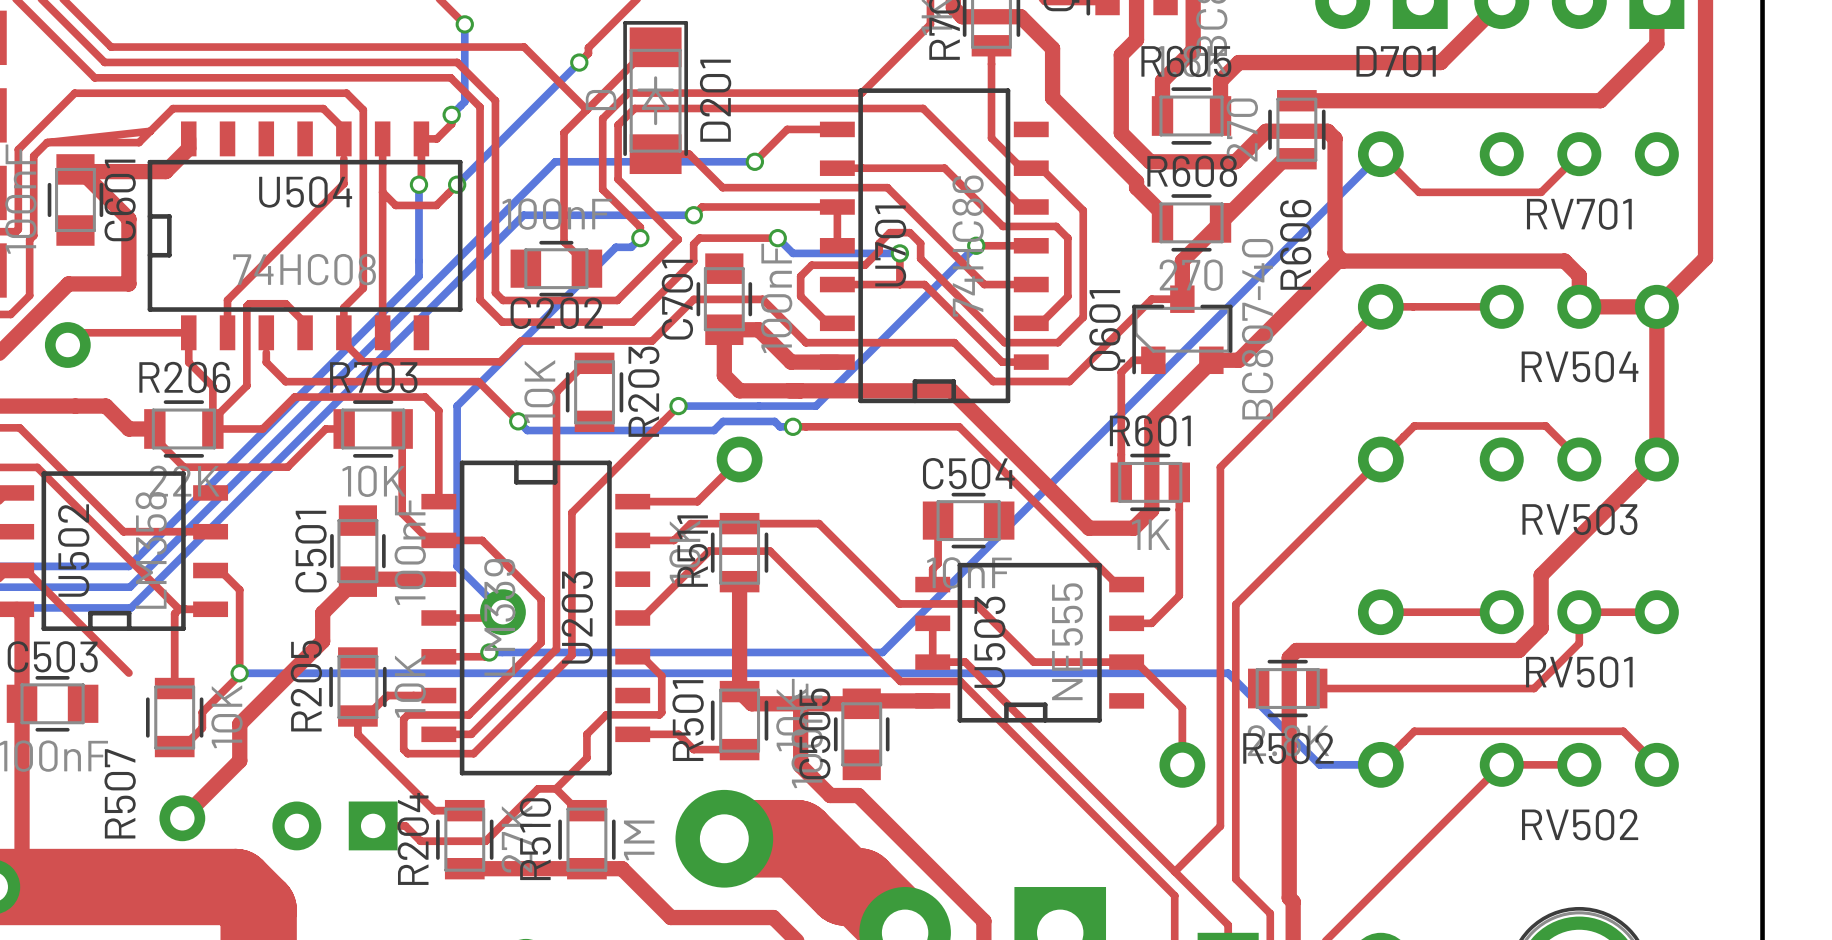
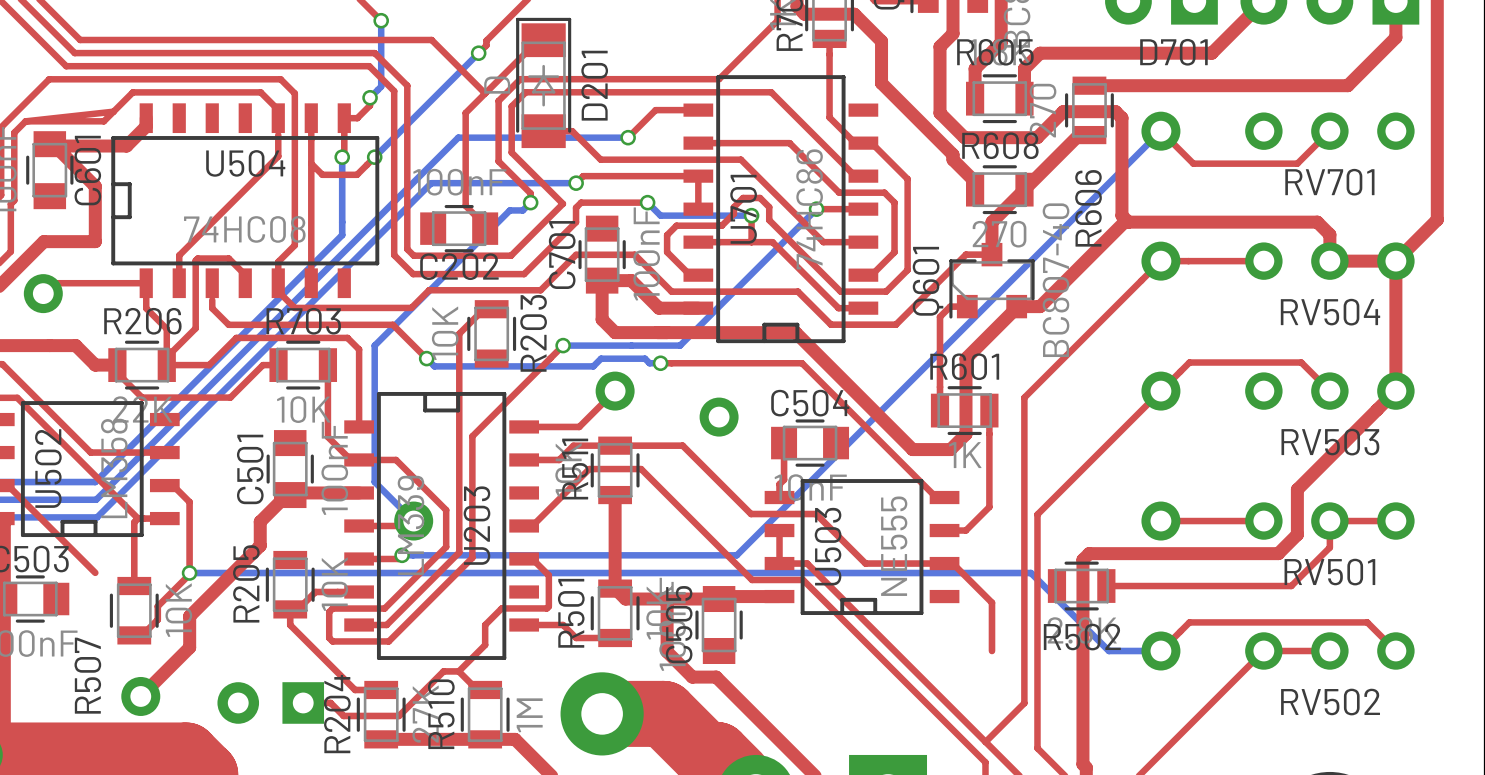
part position: (1182, 764) -> (719, 417)

